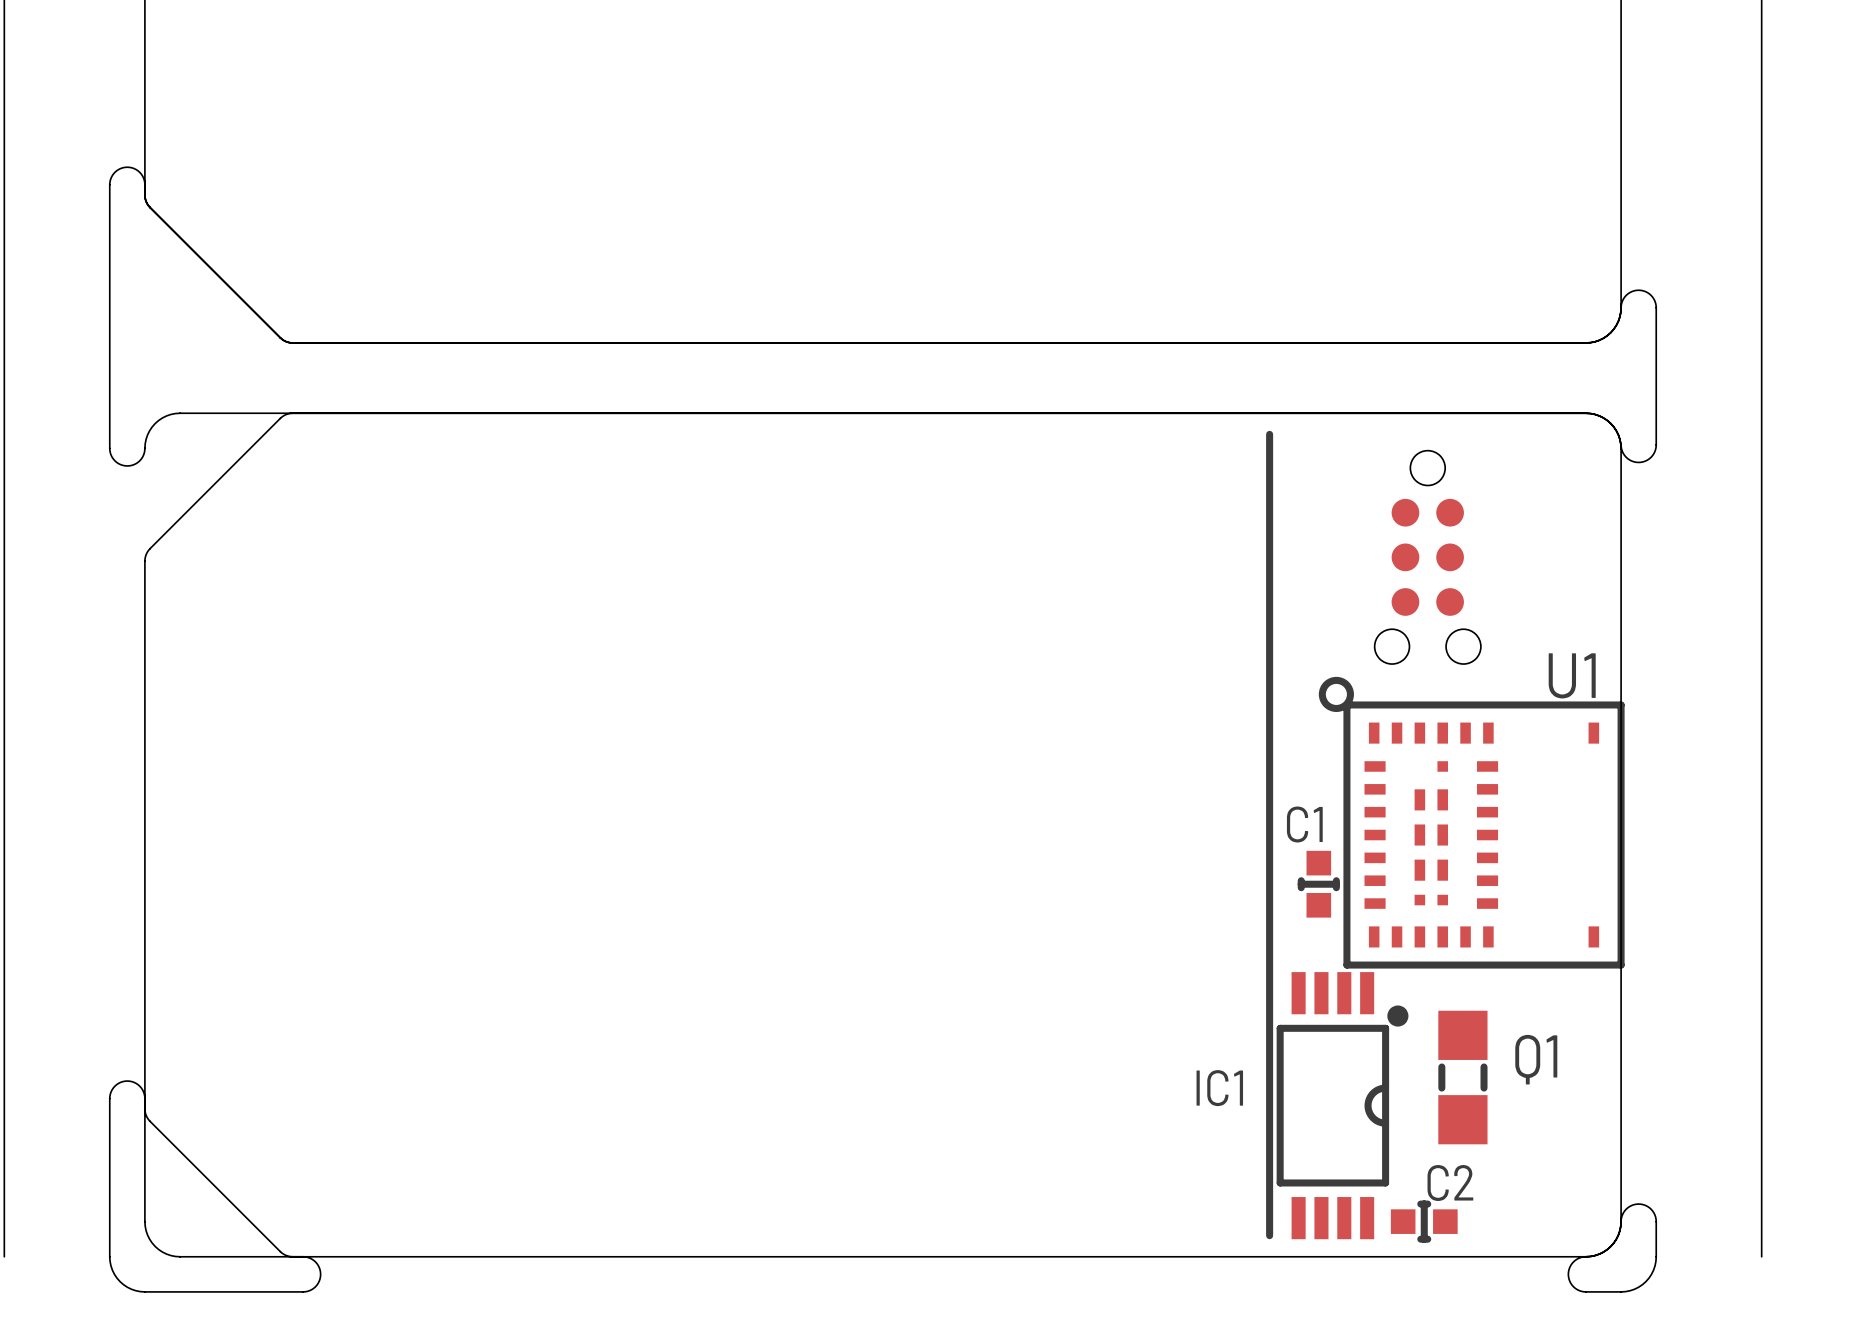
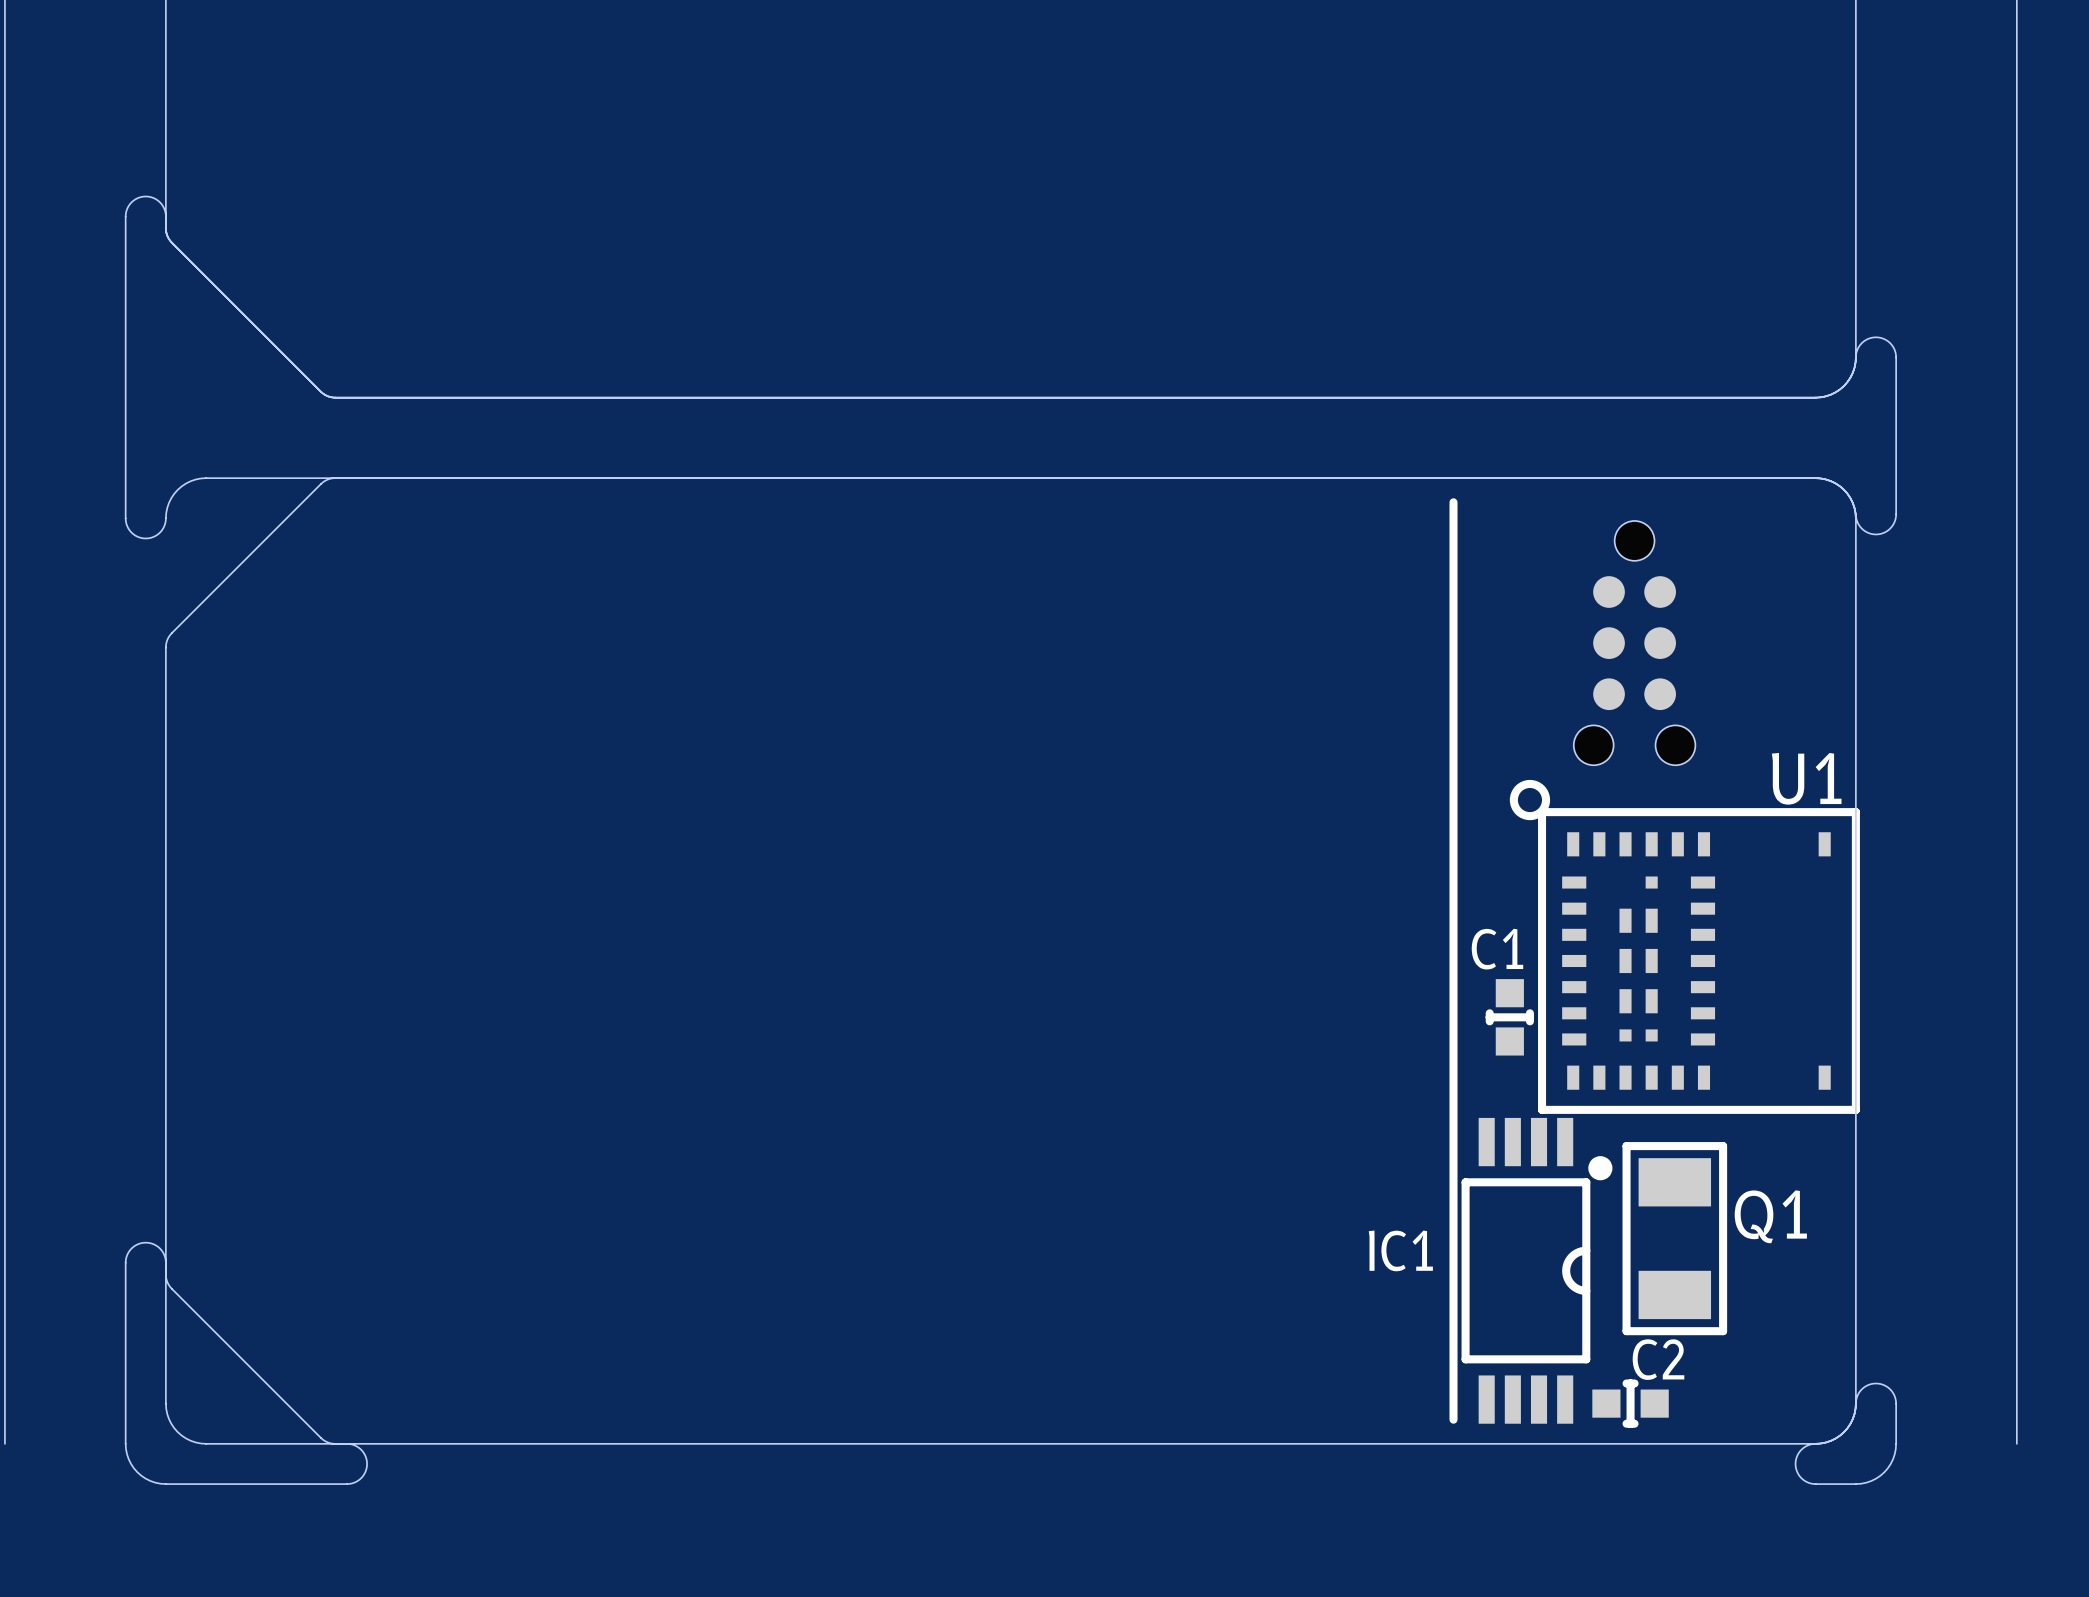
Q1 footprint: [1438, 1010, 1488, 1145] -> [1622, 1142, 1728, 1336]

